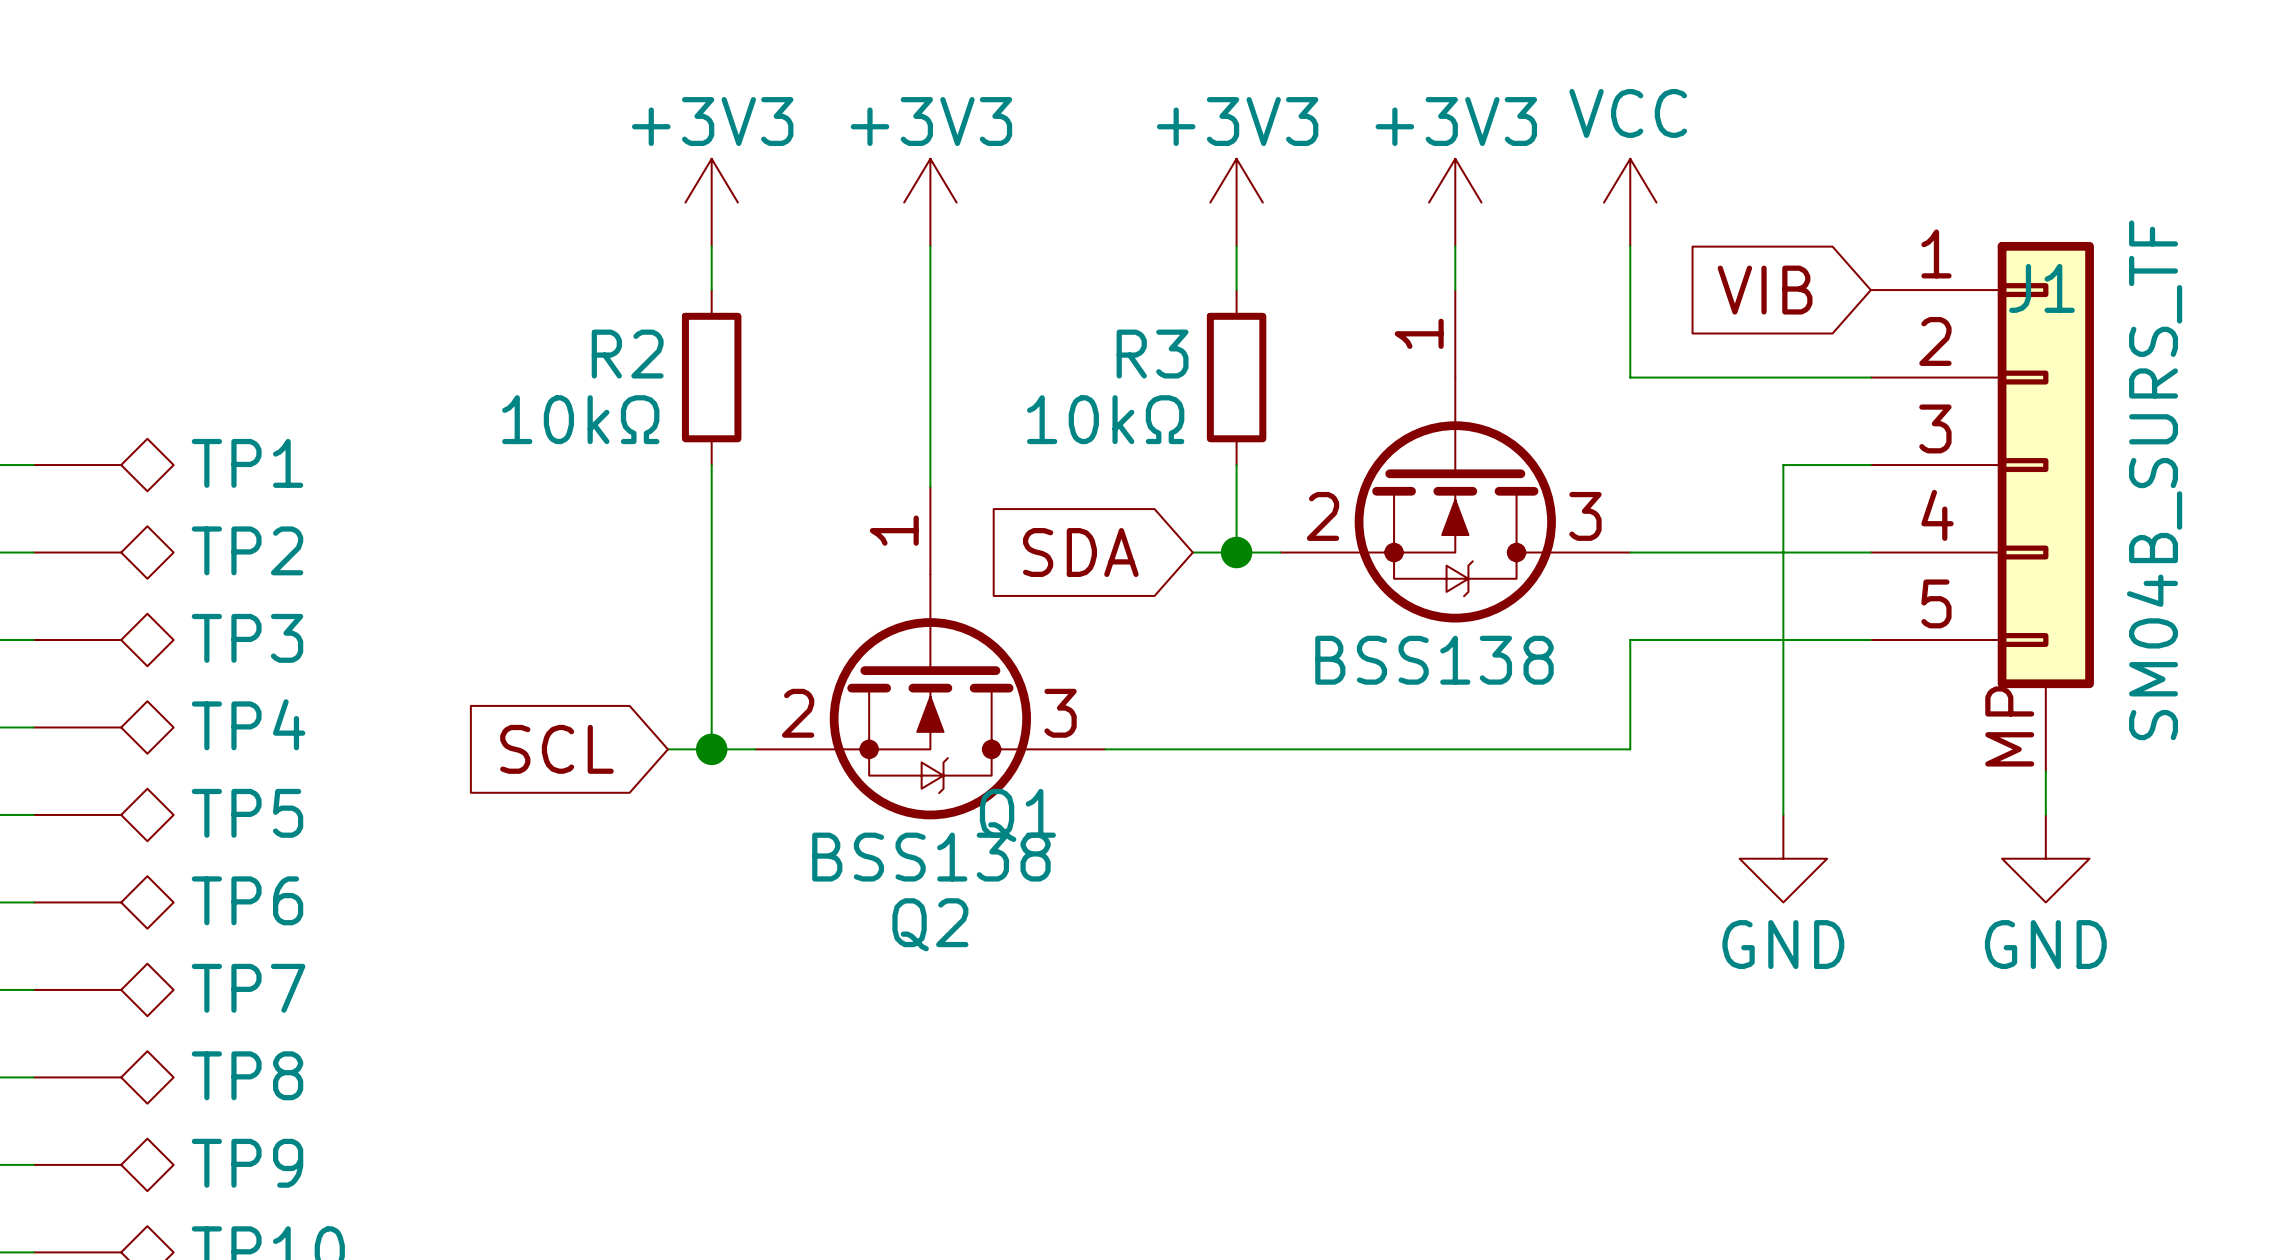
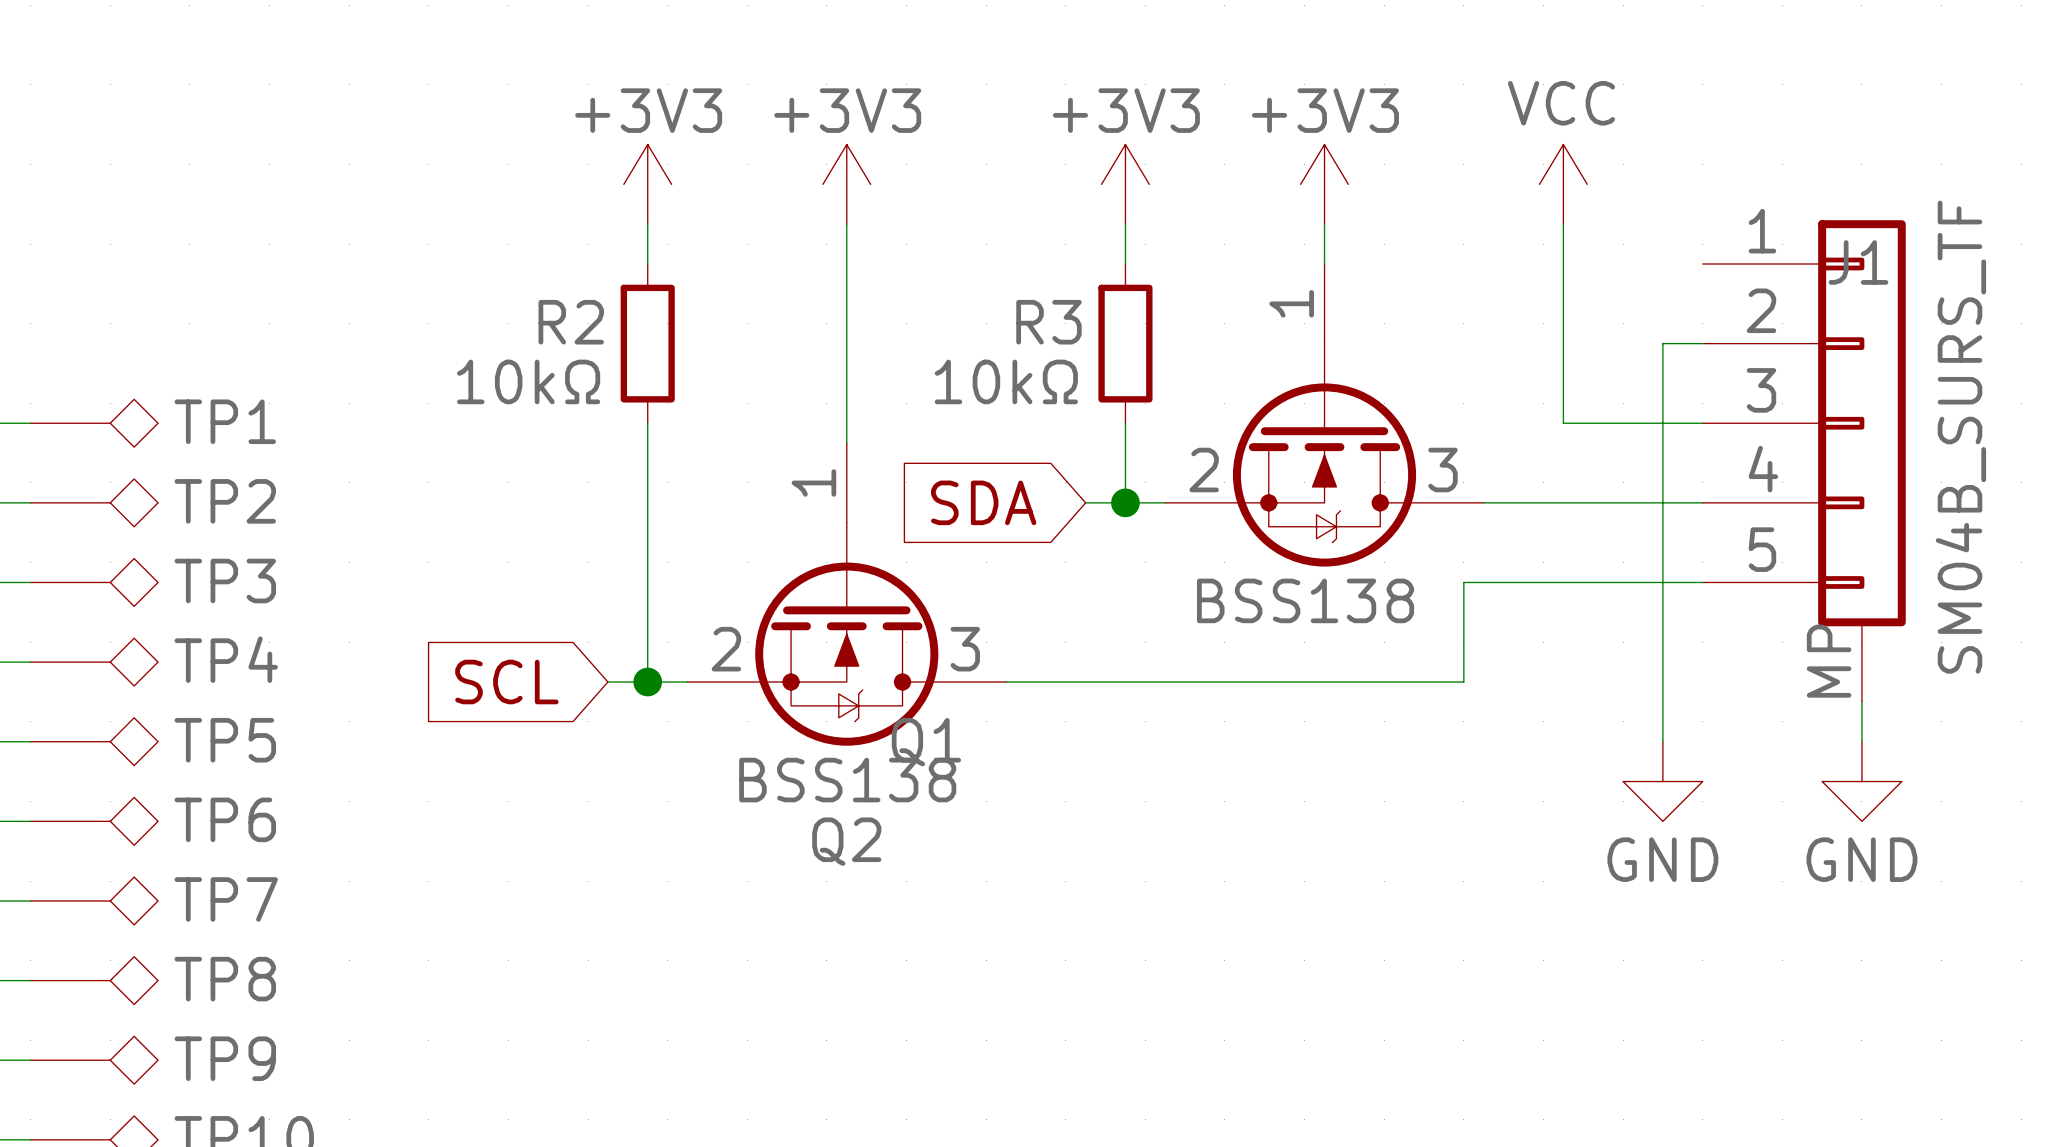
power symbol position: VCC (1630, 202) -> VCC (1563, 184)
wire: (1630, 246) (1630, 377) (1827, 377) -> (1662, 741) (1662, 343)
global label: VIB (1765, 290) -> none
wire: (1783, 465) (1783, 814) -> (1623, 423) (1563, 423) (1563, 224)
wire: (1630, 640) (1630, 749) (1608, 749) -> (1483, 582) (1463, 582) (1463, 682)
power symbol position: GND (1783, 858) -> GND (1662, 781)

